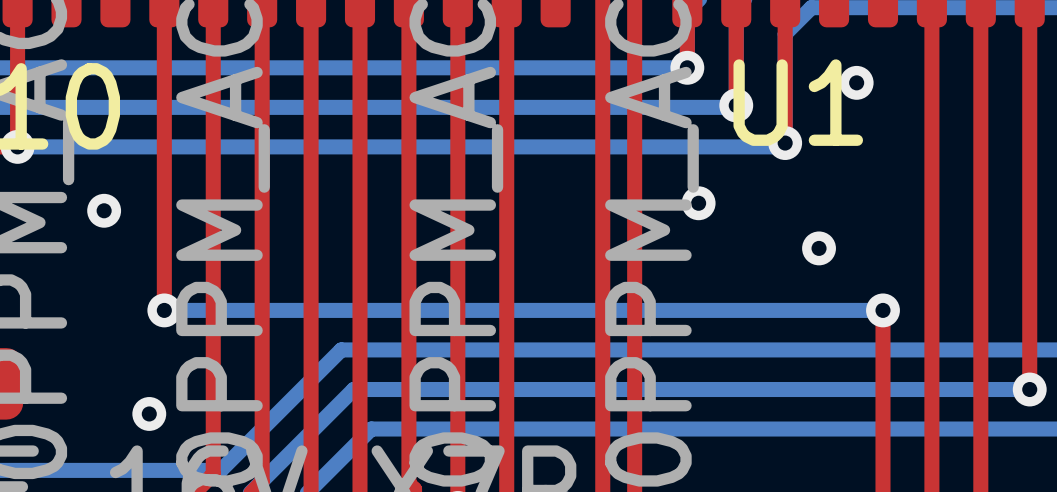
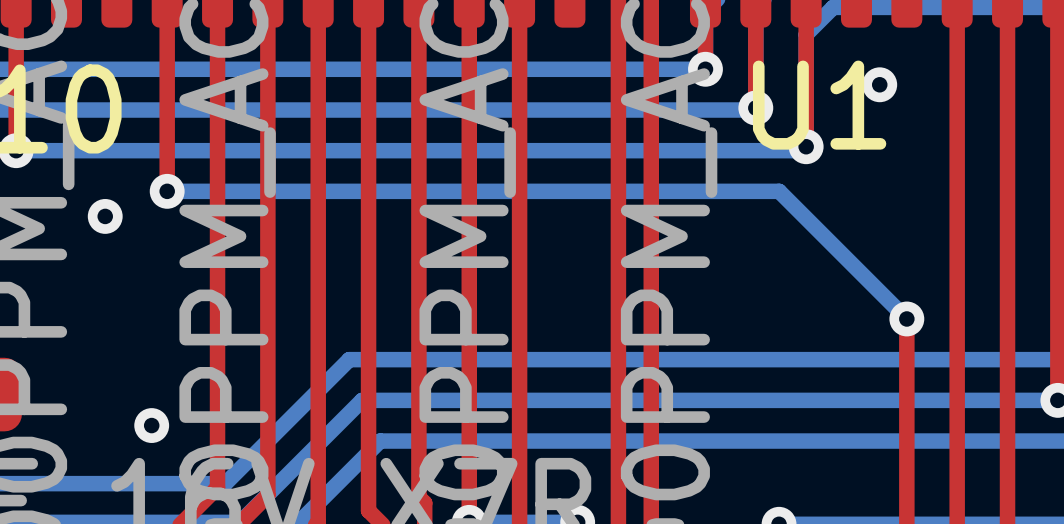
top track: (164, 186) (164, 310) -> none
via: (698, 203) -> none
via: (819, 248) -> none
bottom track: (164, 310) (882, 310) -> (167, 191) (779, 191) (906, 318)
via position: (164, 310) -> (167, 191)

